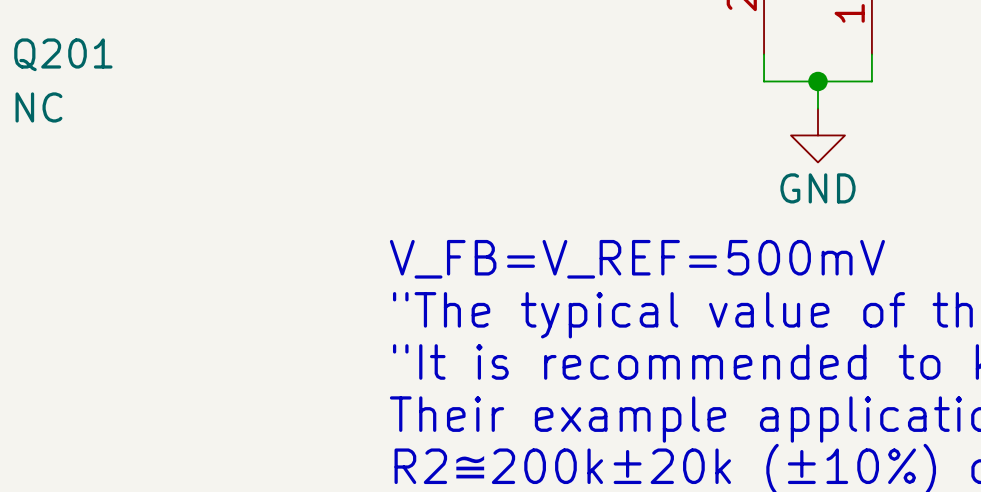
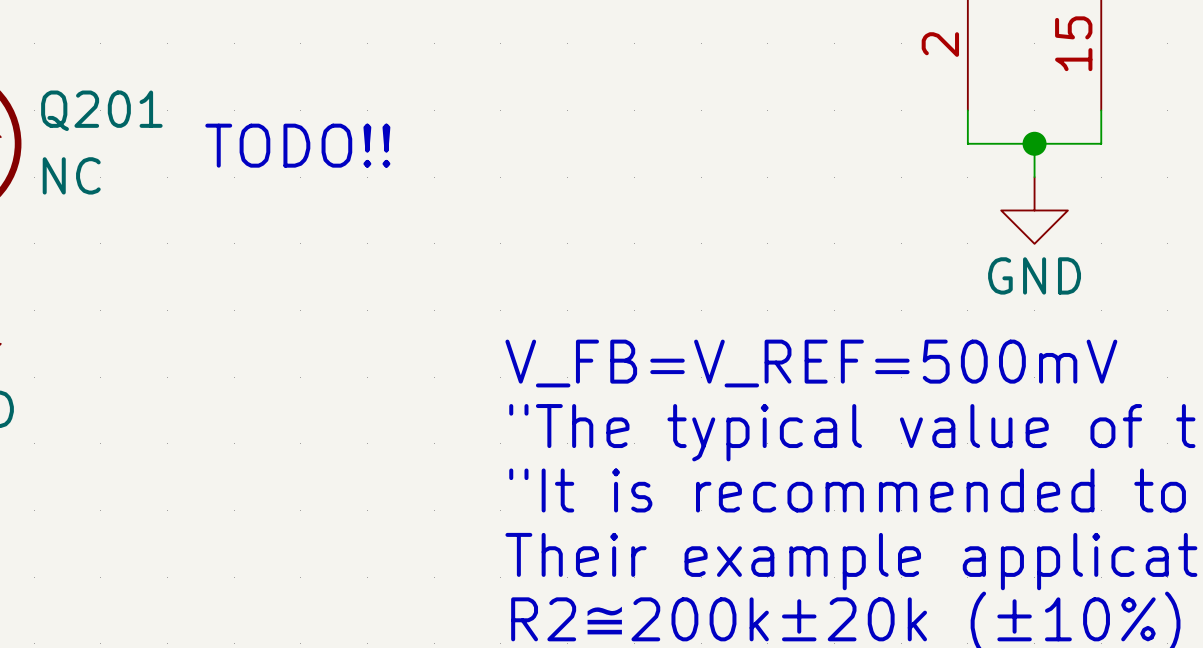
text: none -> TODO!! (297, 145)

